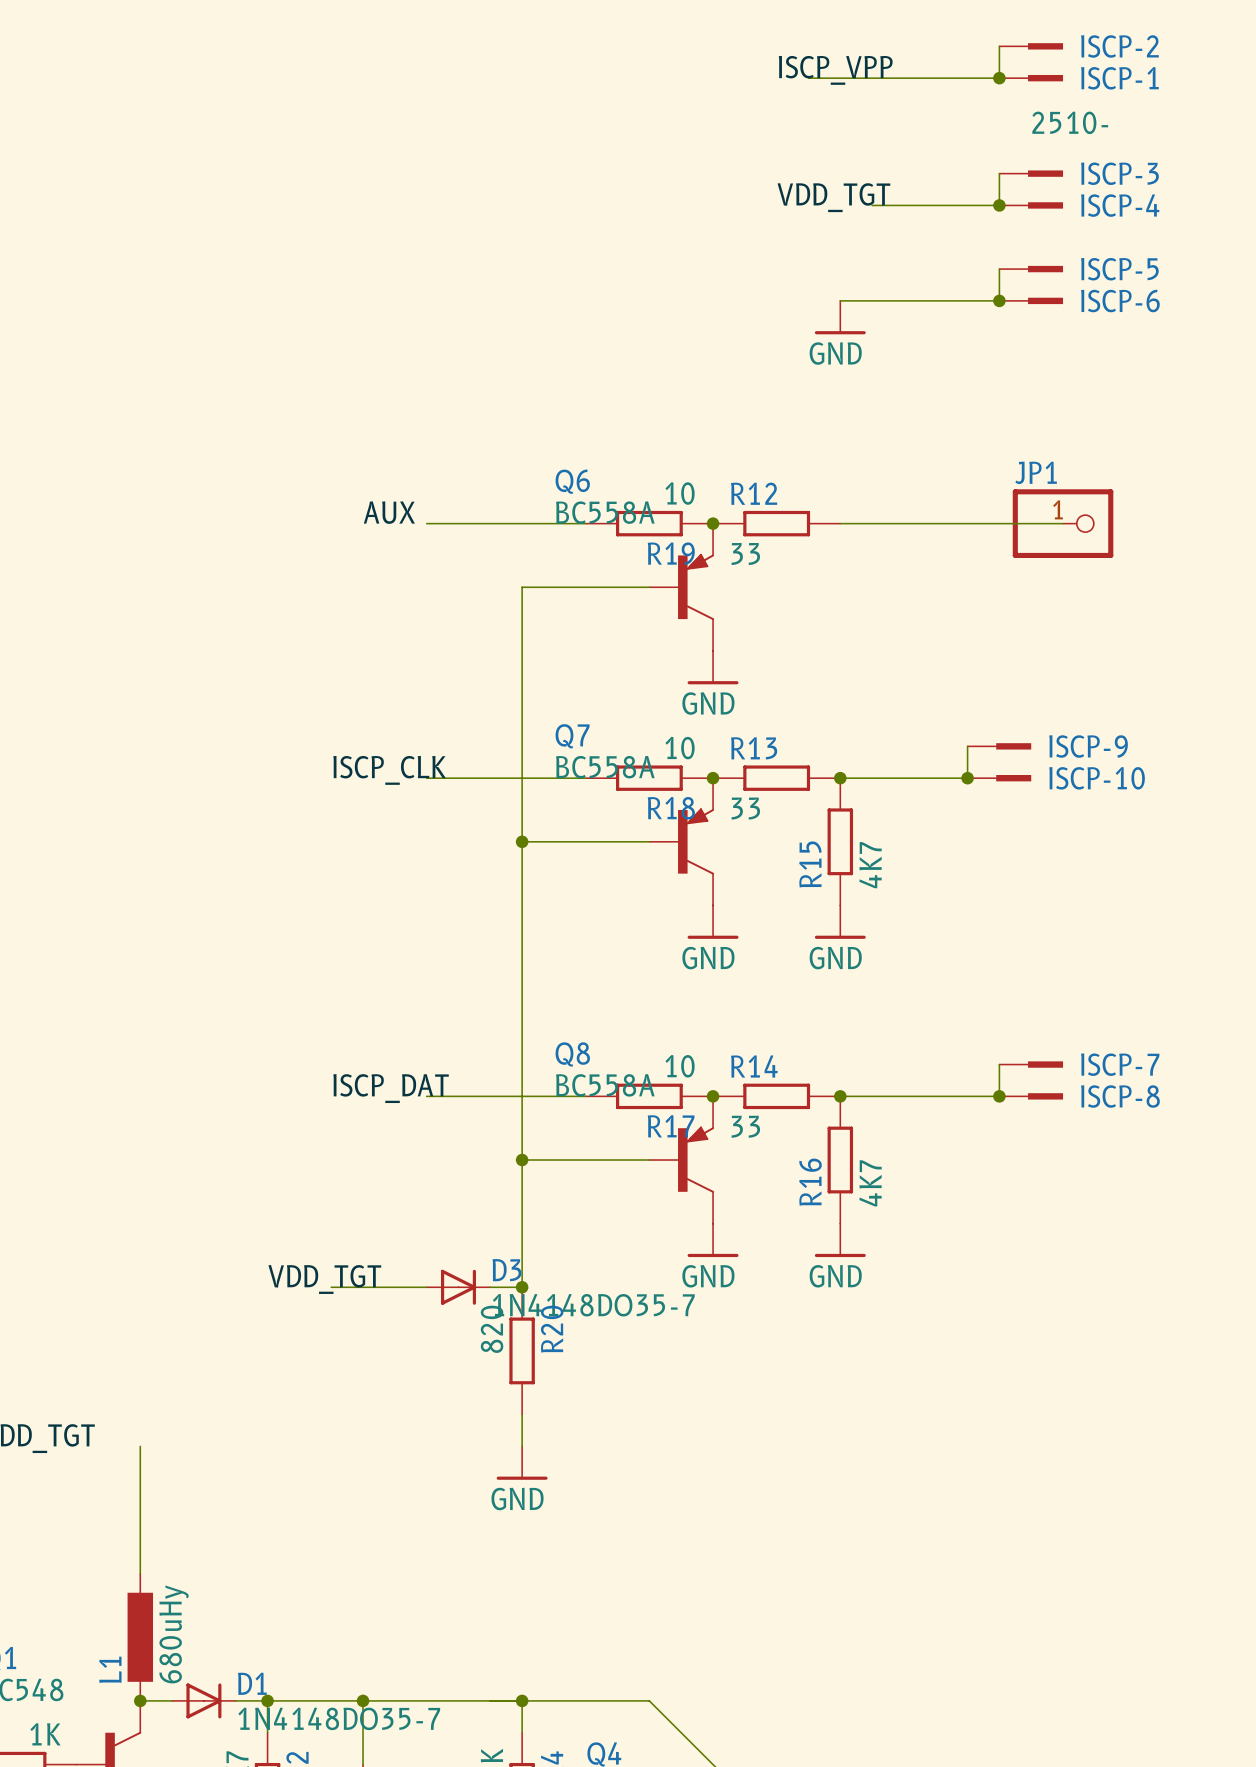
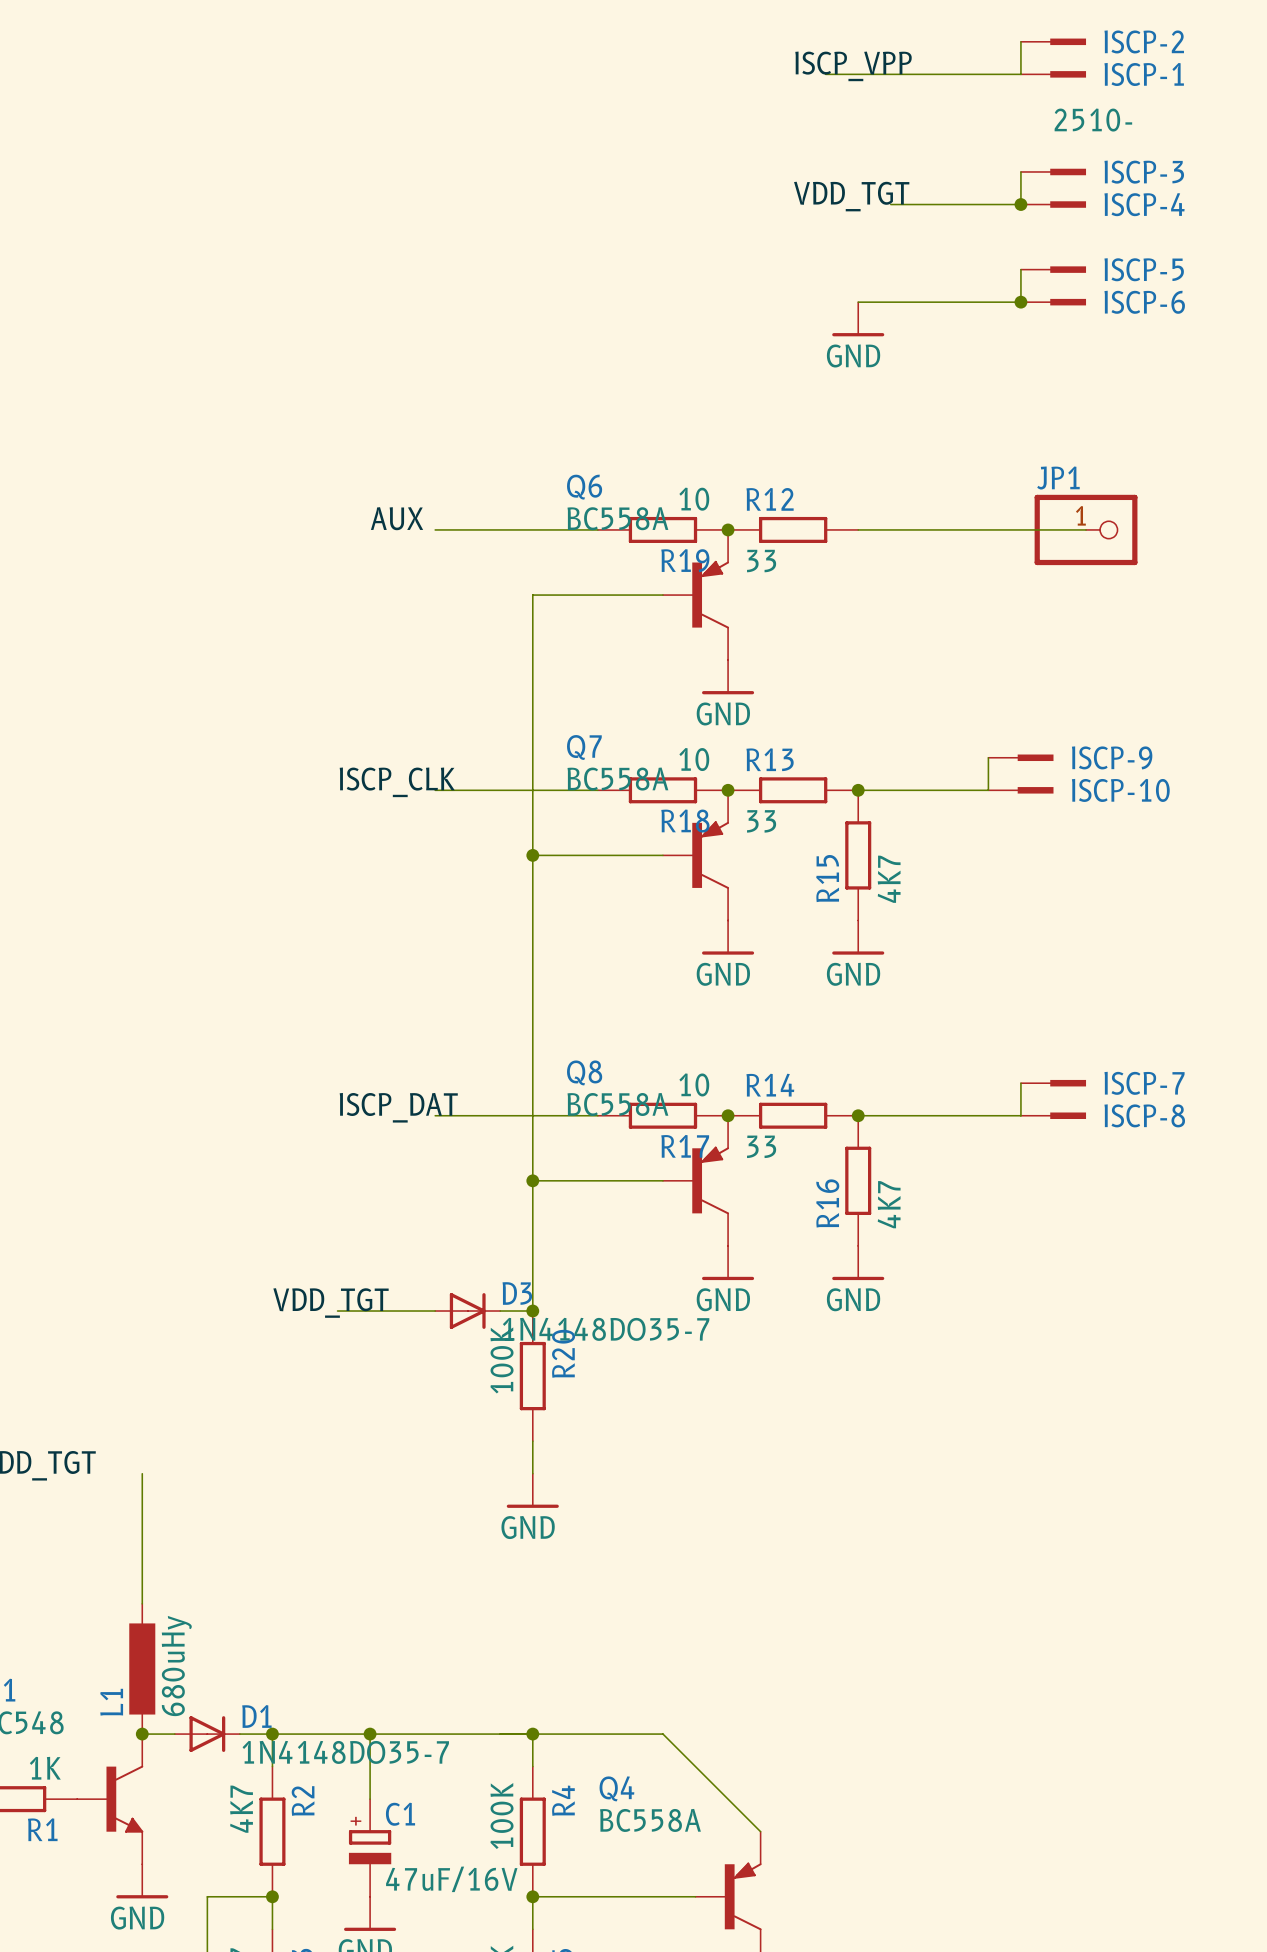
junction: (999, 78) -> none
junction: (967, 778) -> none
junction: (999, 1096) -> none
R20 value: 820 (492, 1329) -> 100K (502, 1360)

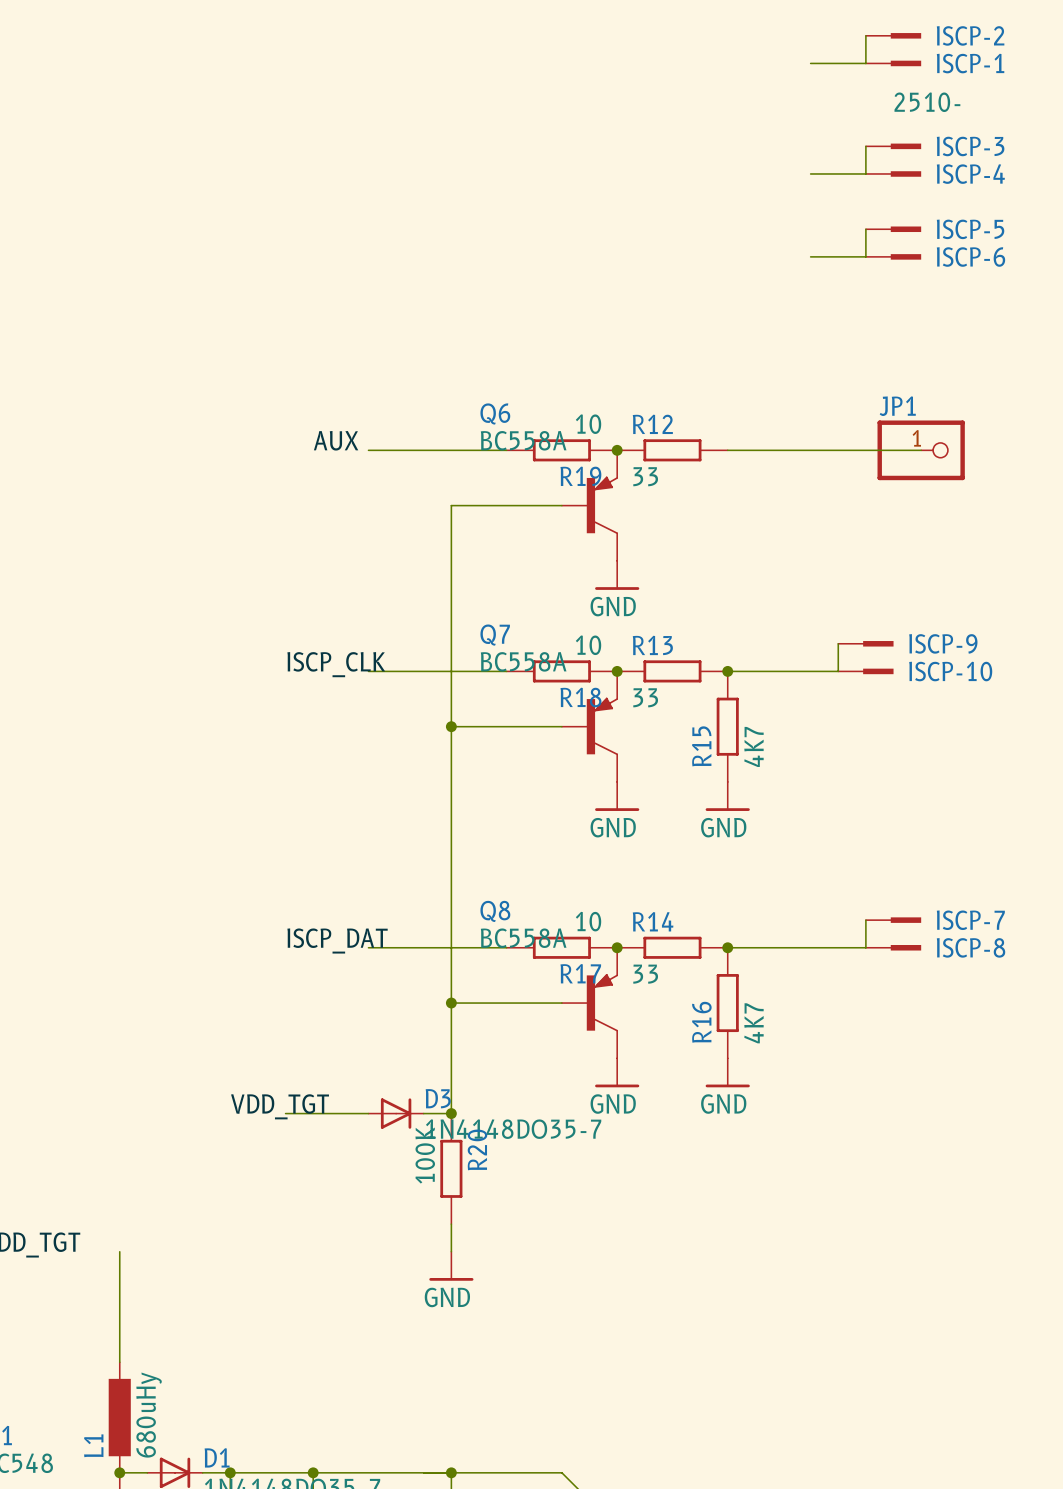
label: ISCP_VPP (853, 66) -> none
wire: (825, 74) (955, 74) -> none
label: VDD_TGT (851, 196) -> none
wire: (890, 204) (955, 204) -> none
junction: (1020, 204) -> none
wire: (858, 302) (955, 302) -> none
junction: (1020, 302) -> none
power symbol: GND (858, 319) -> none

